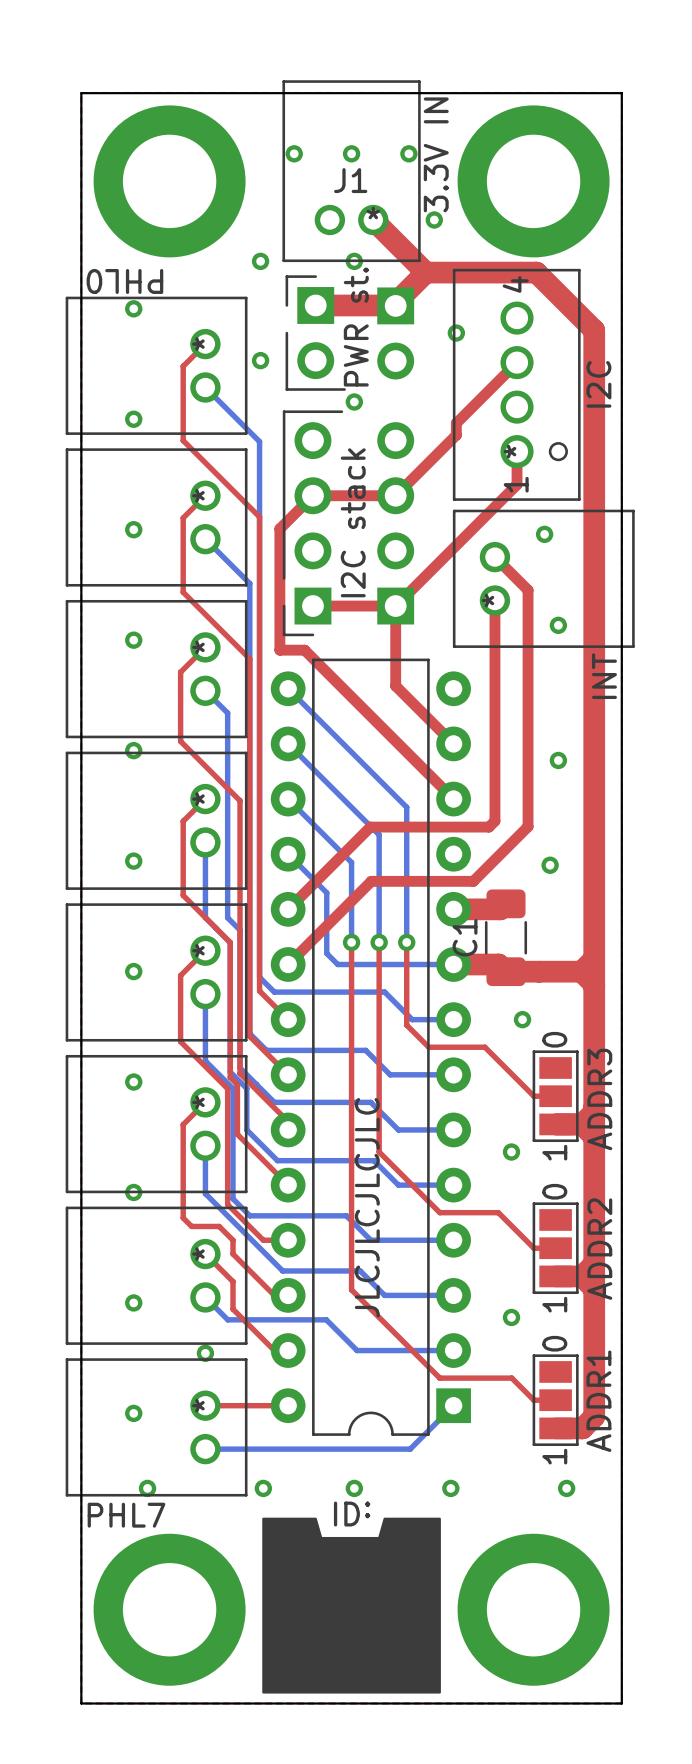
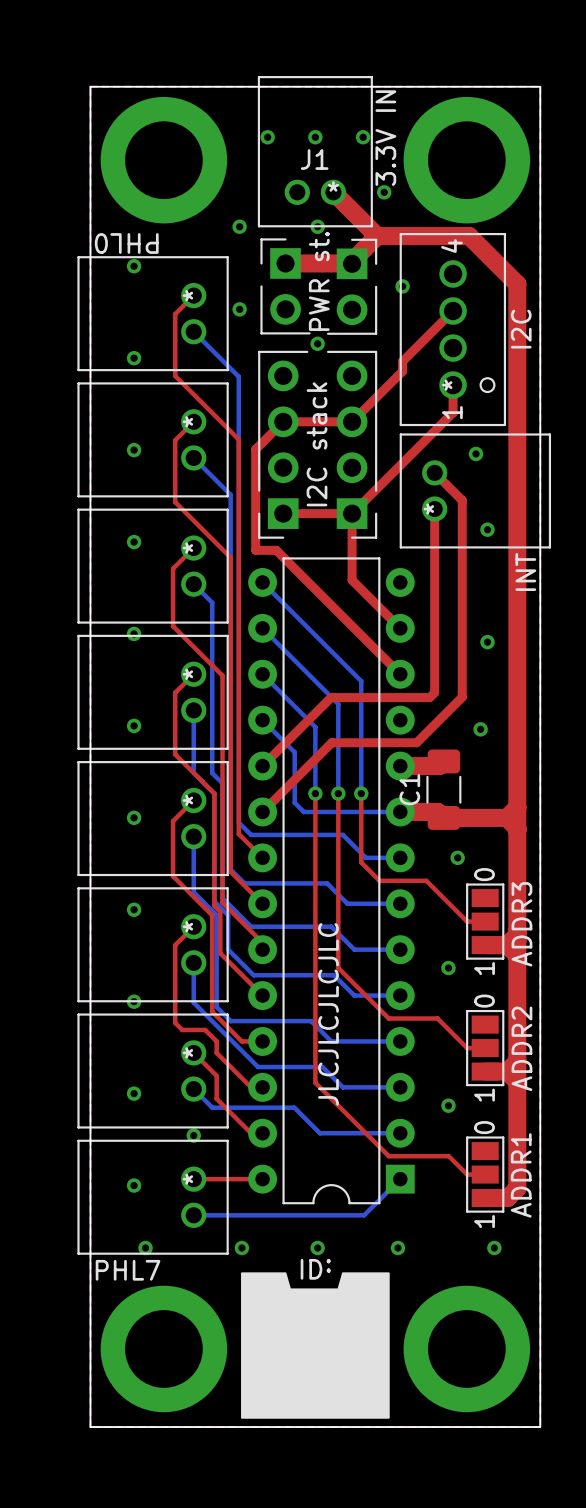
part side: bottom (395, 333) -> top (352, 286)
I2C stack side: bottom (395, 523) -> top (352, 444)

